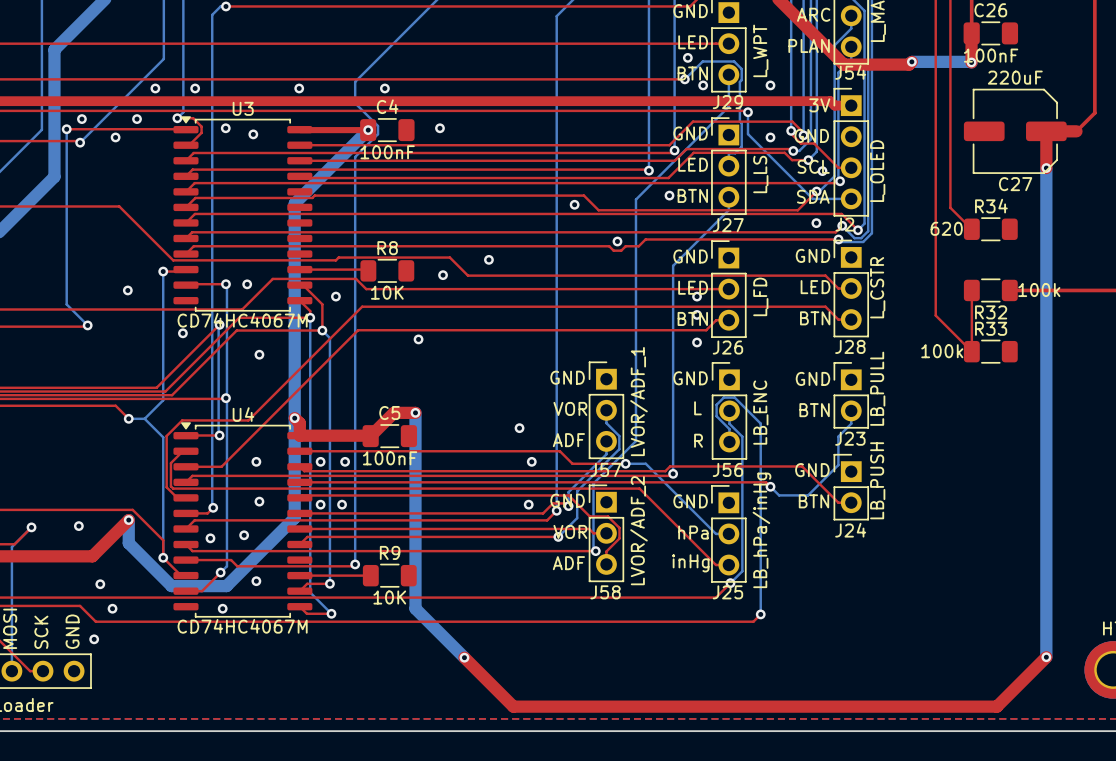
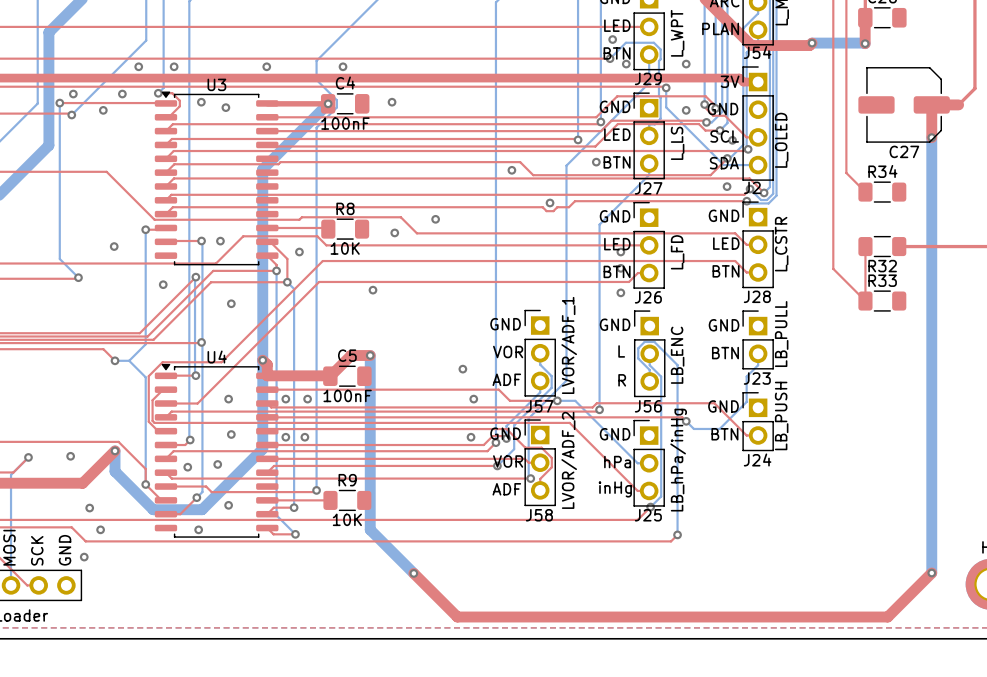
C26 value: 100nF (991, 55) -> none
C27 value: 220uF (1015, 77) -> none
R34 value: 620 (946, 228) -> none
R32 value: 100k (1039, 290) -> none
U3 value: CD74HC4067M (242, 320) -> none
R33 value: 100k (942, 351) -> none
U4 value: CD74HC4067M (242, 626) -> none

